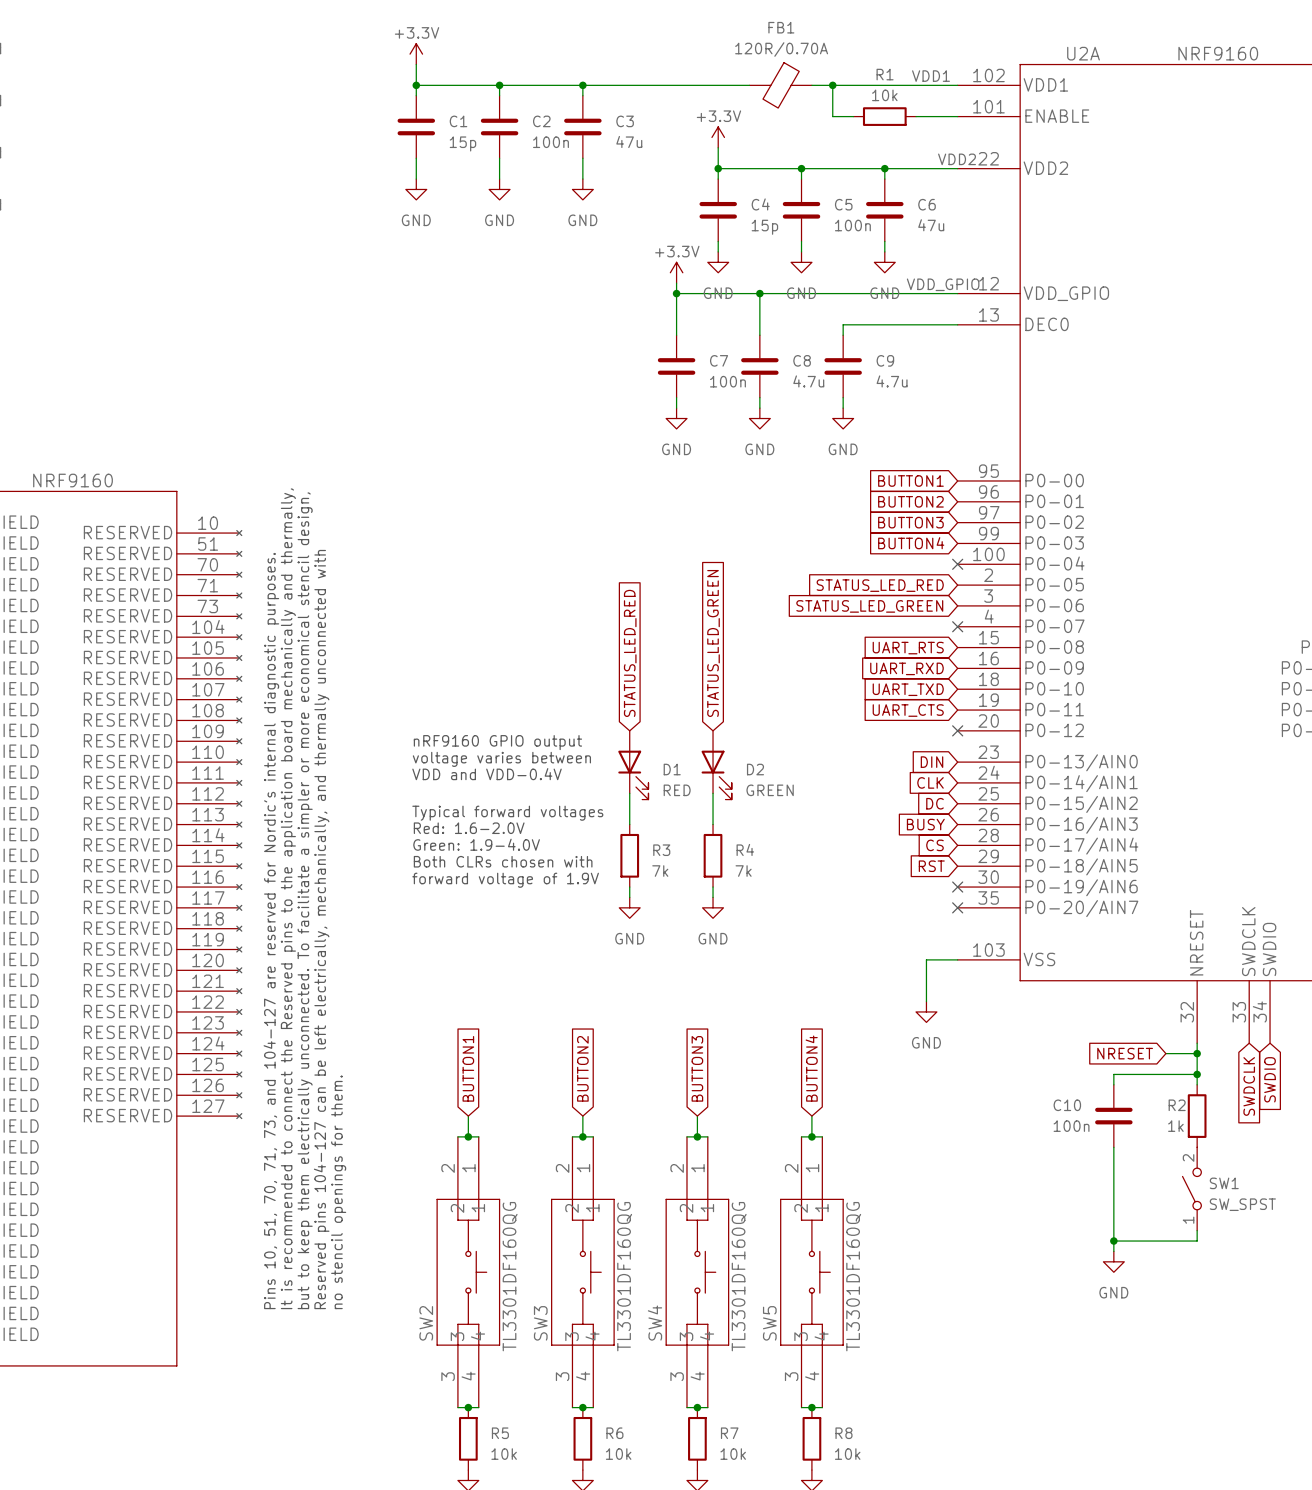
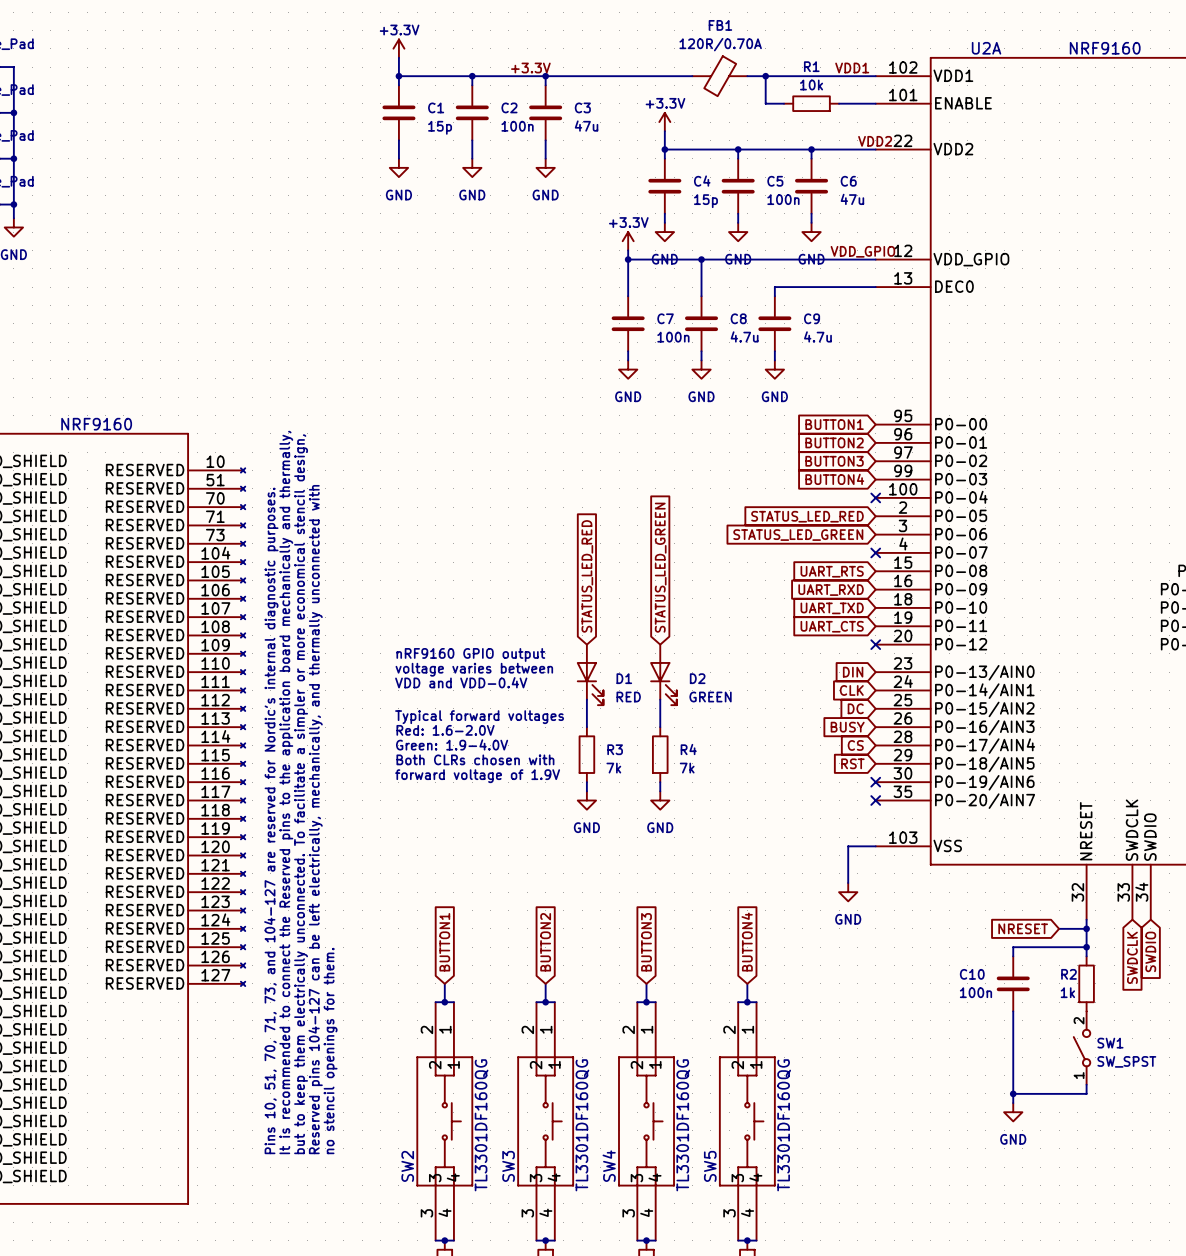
label: none -> +3.3V (530, 68)

